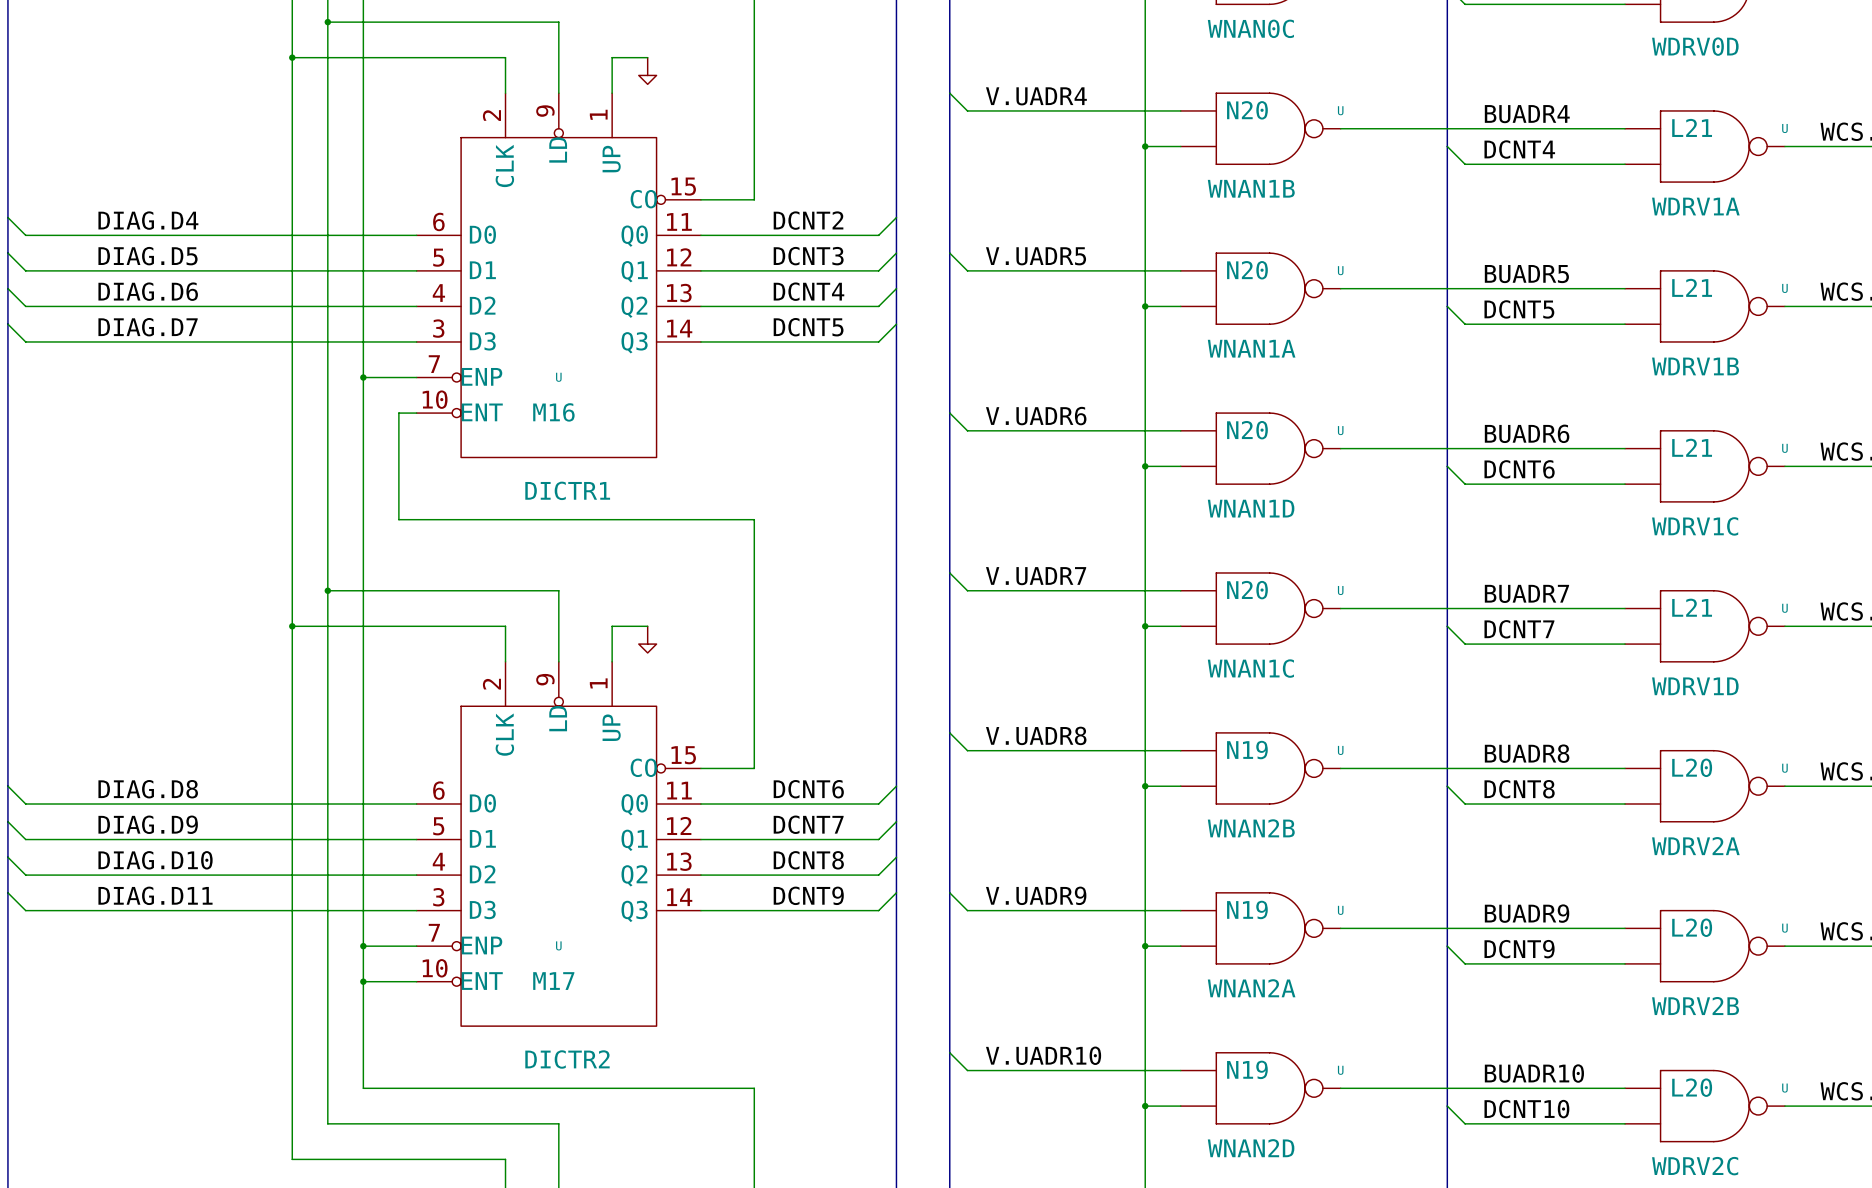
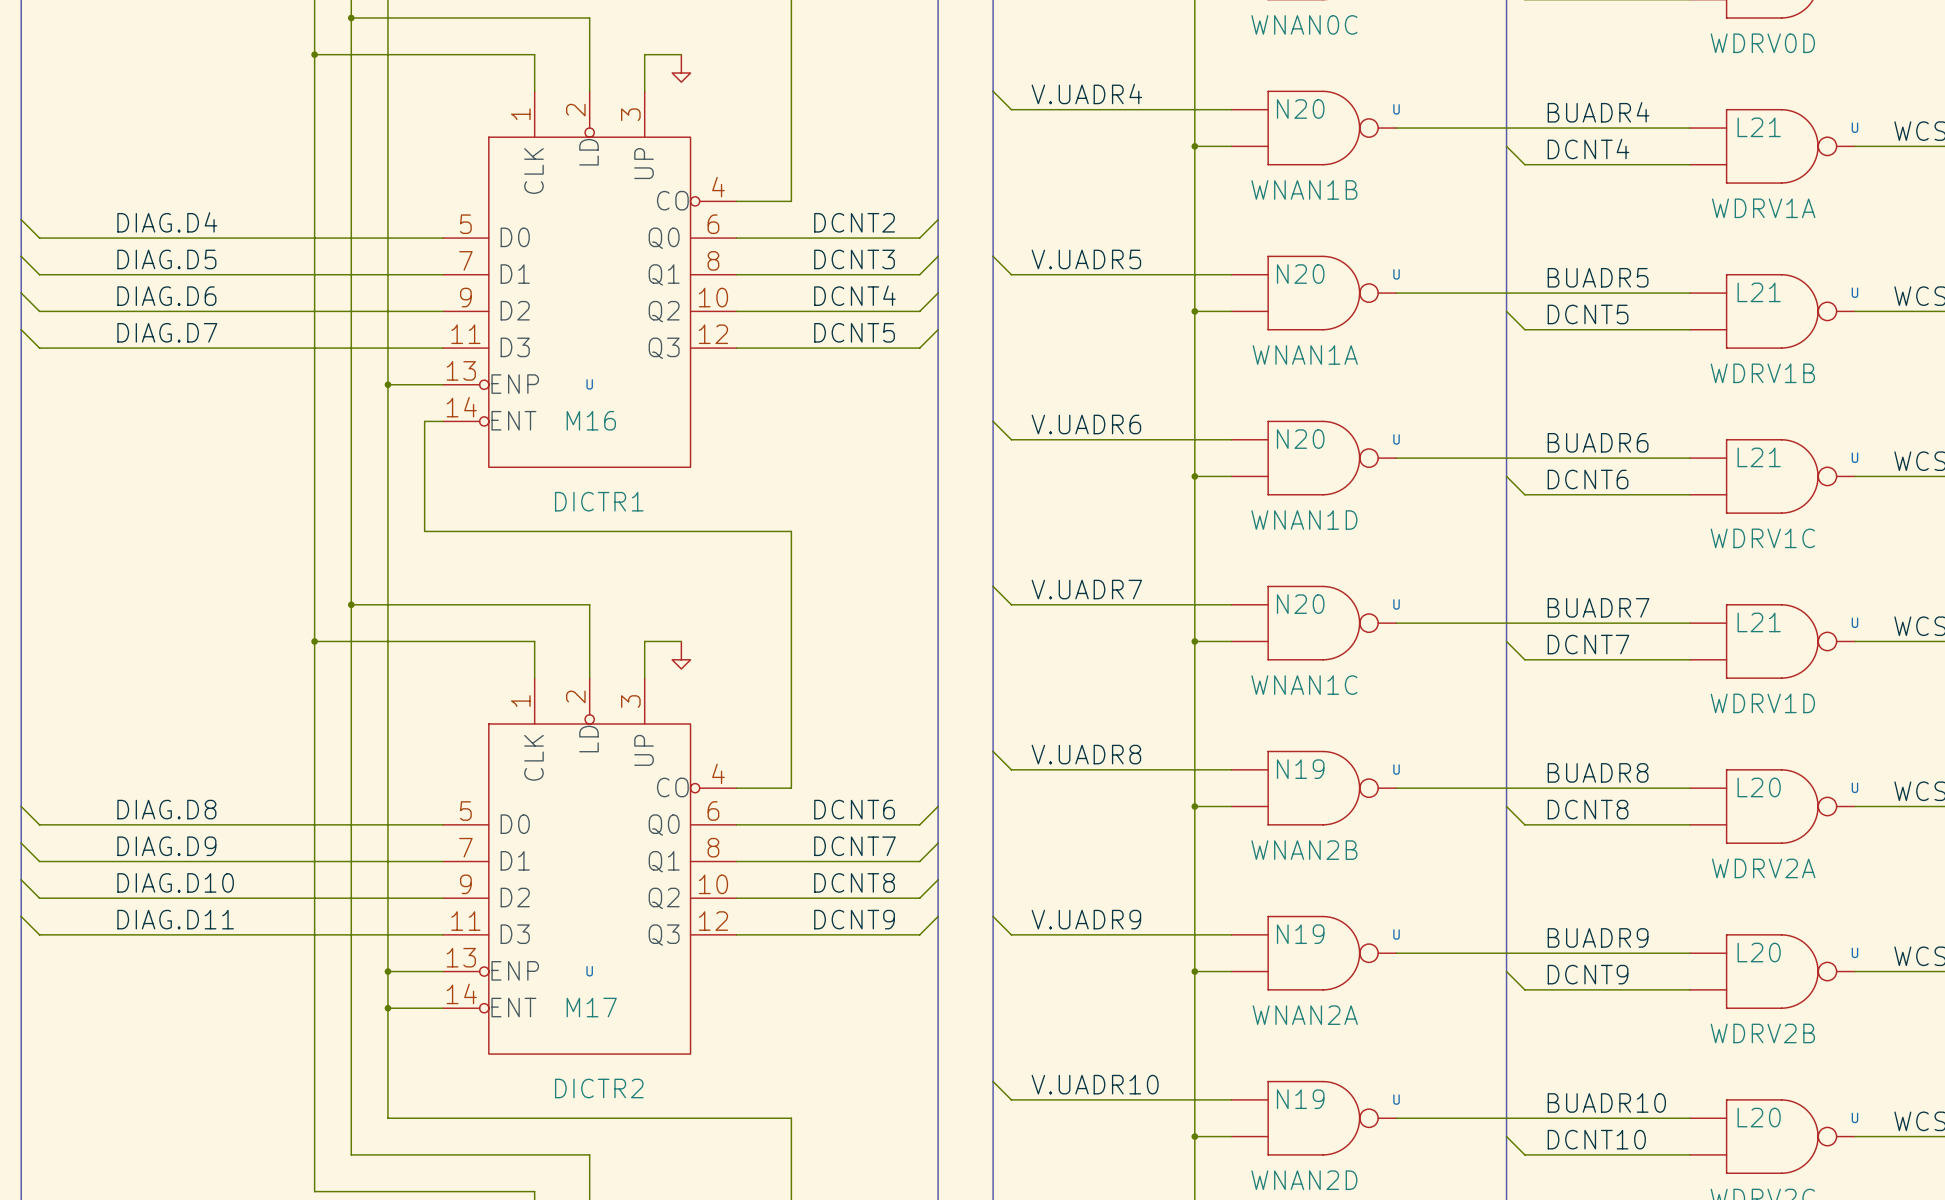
U symbol: [416, 93, 701, 458] -> [442, 91, 737, 468]
U symbol: [416, 661, 701, 1027] -> [442, 678, 737, 1055]

